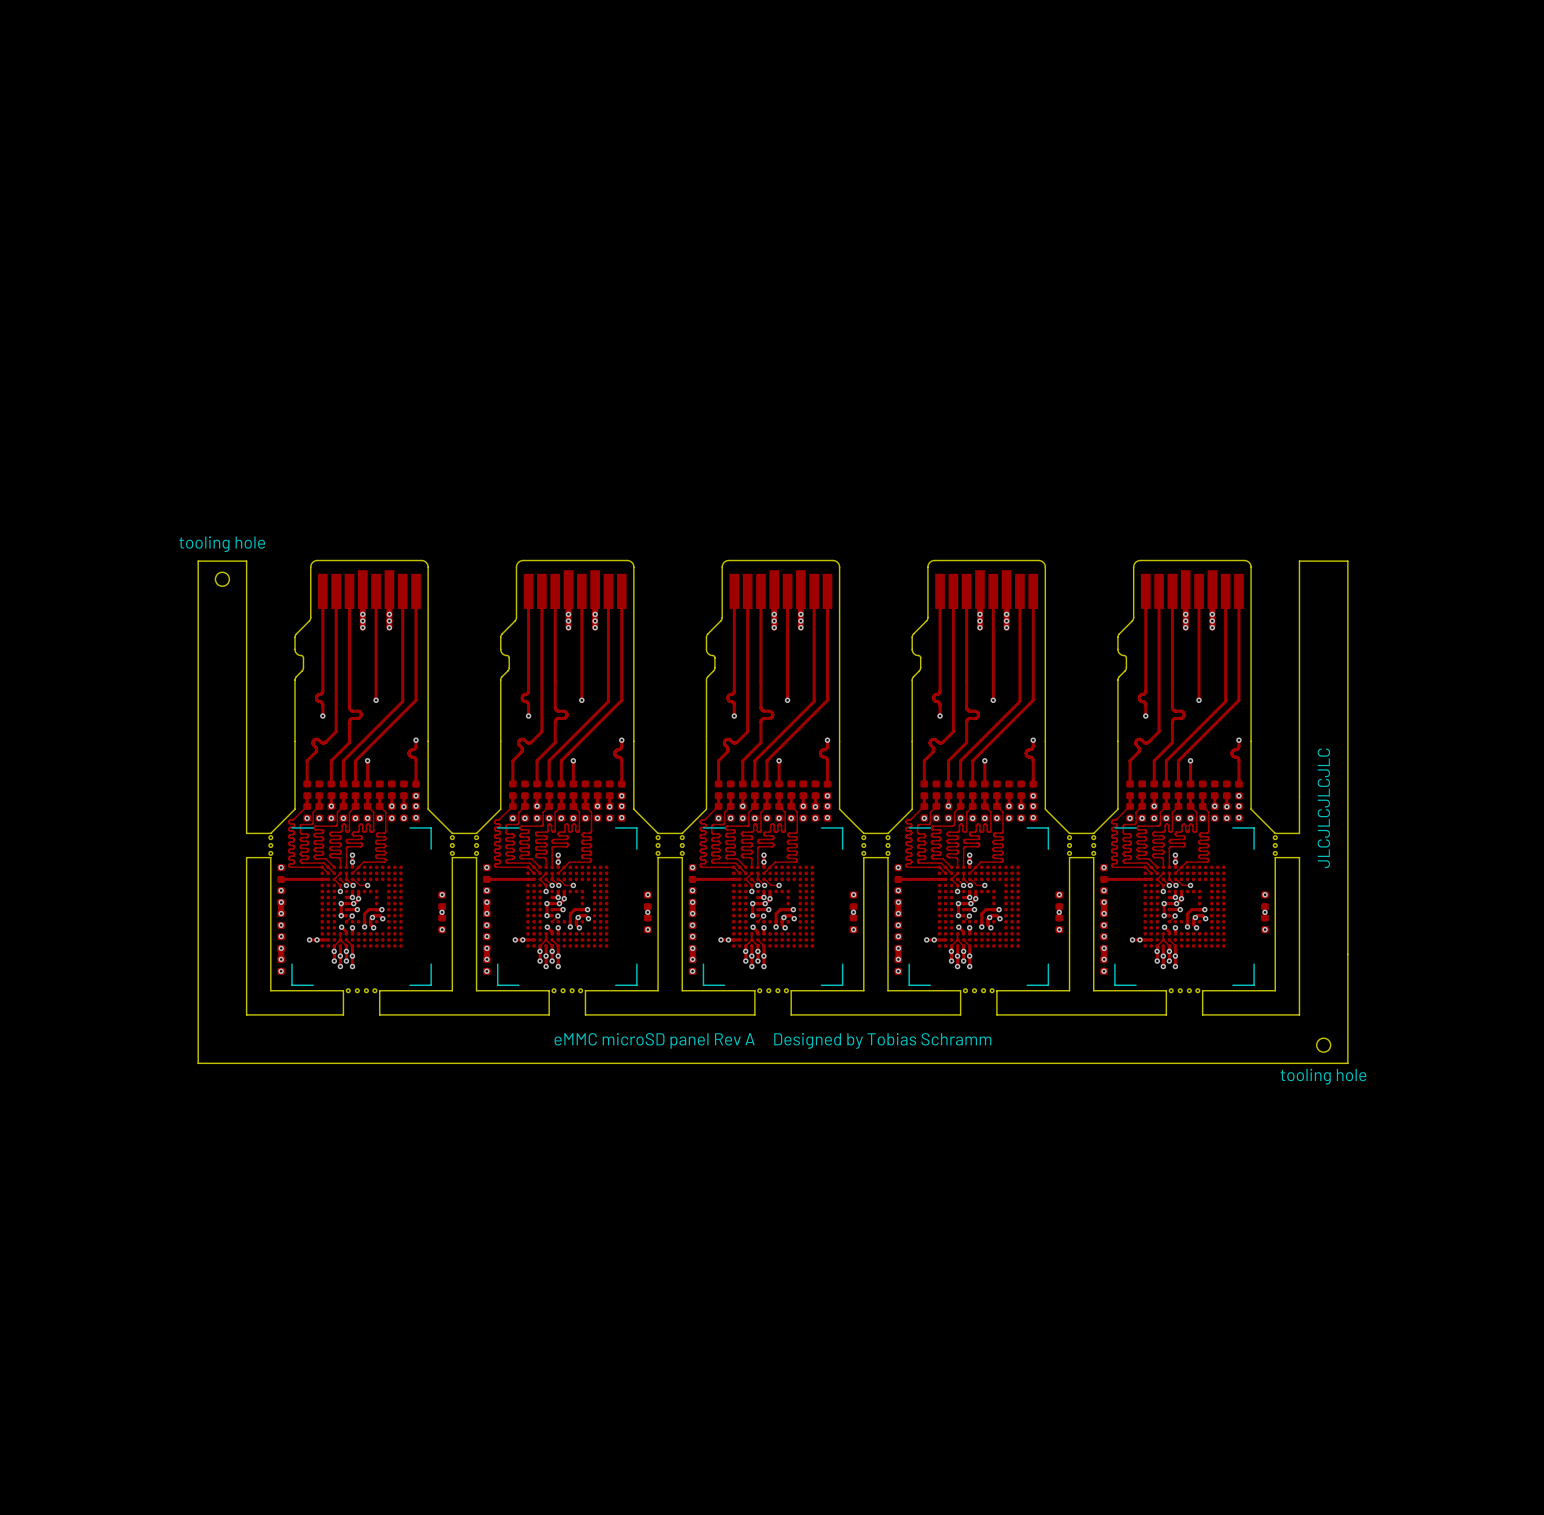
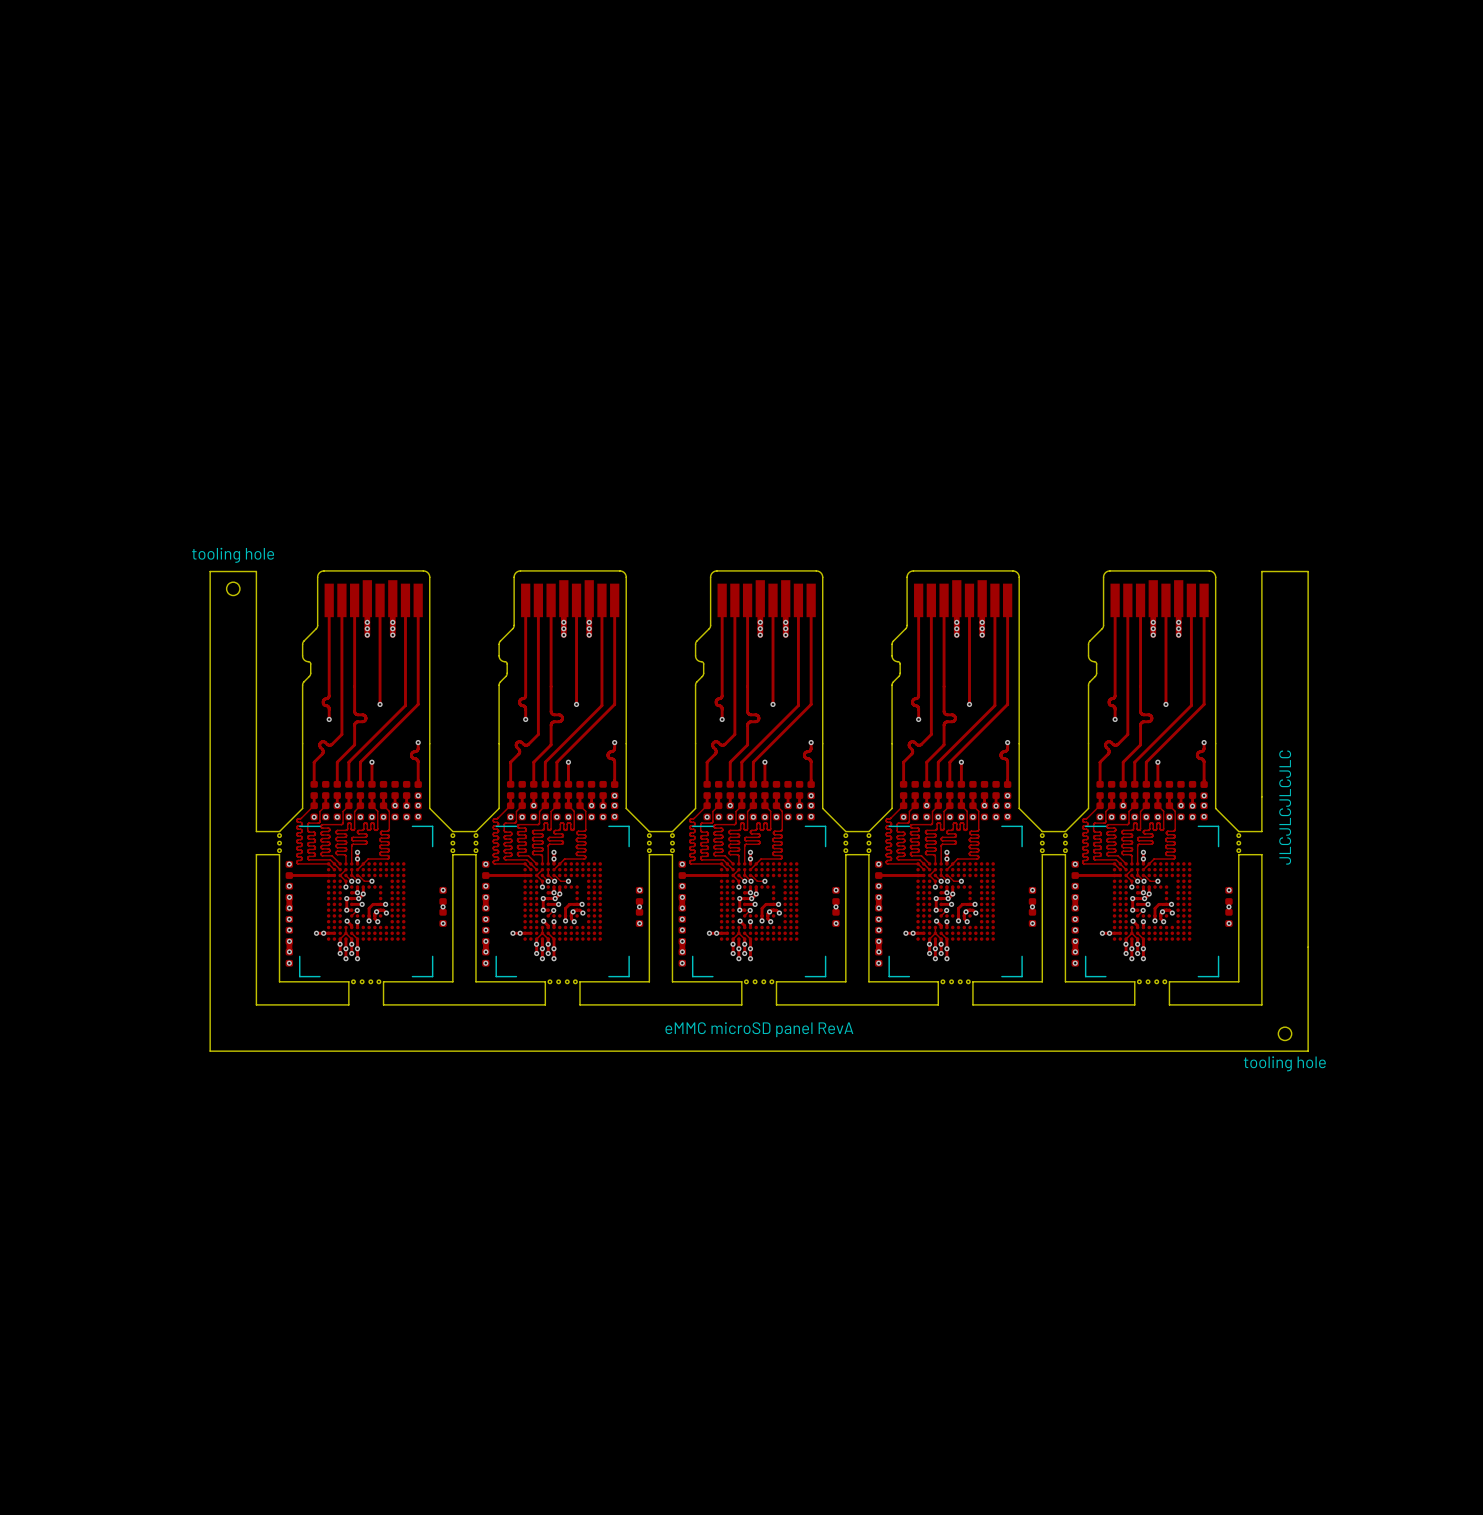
text: eMMC microSD panel Rev A Designed by Tobias Schramm (772, 1040) -> eMMC microSD panel RevA (759, 1029)

